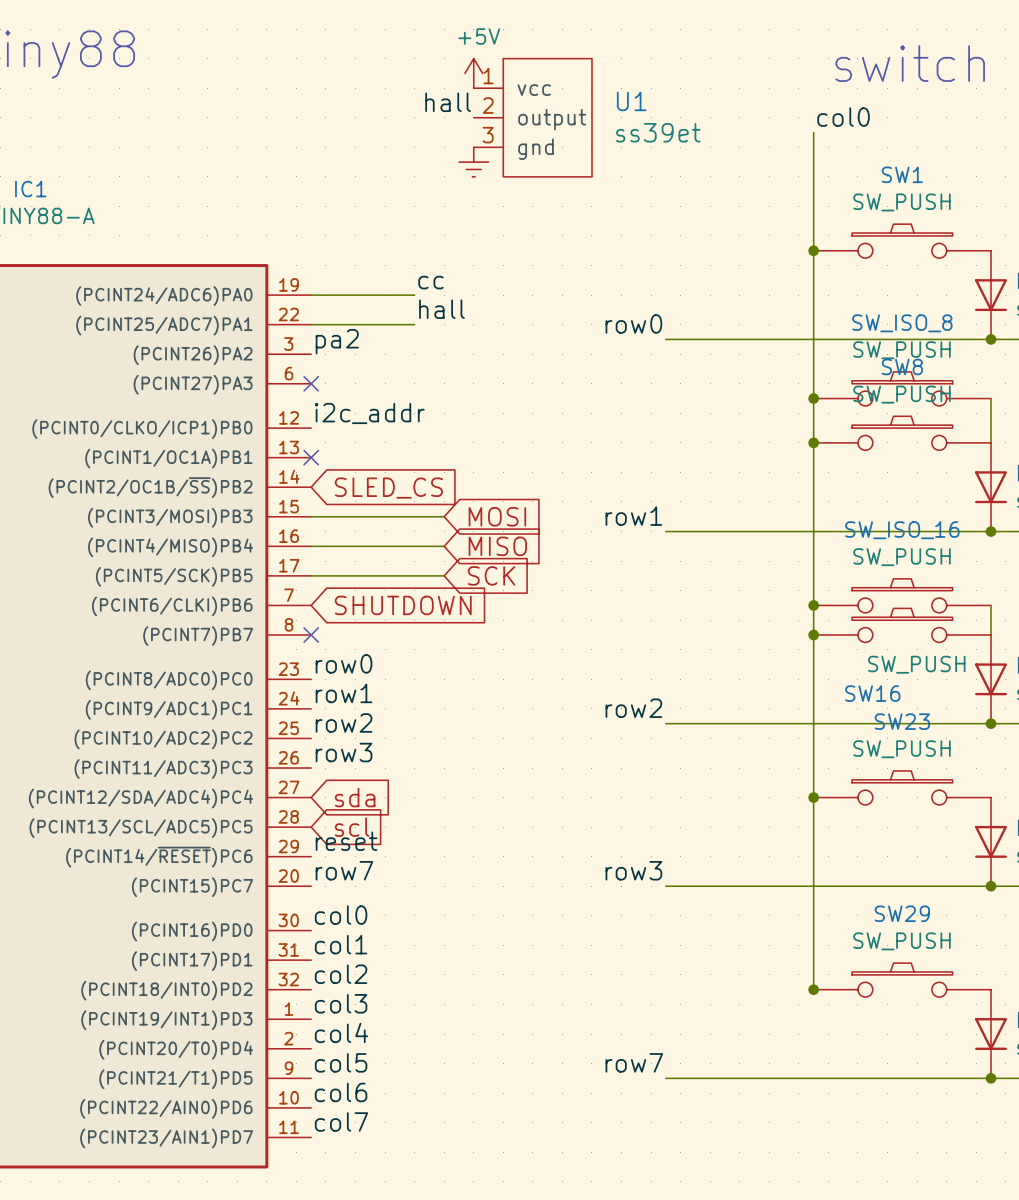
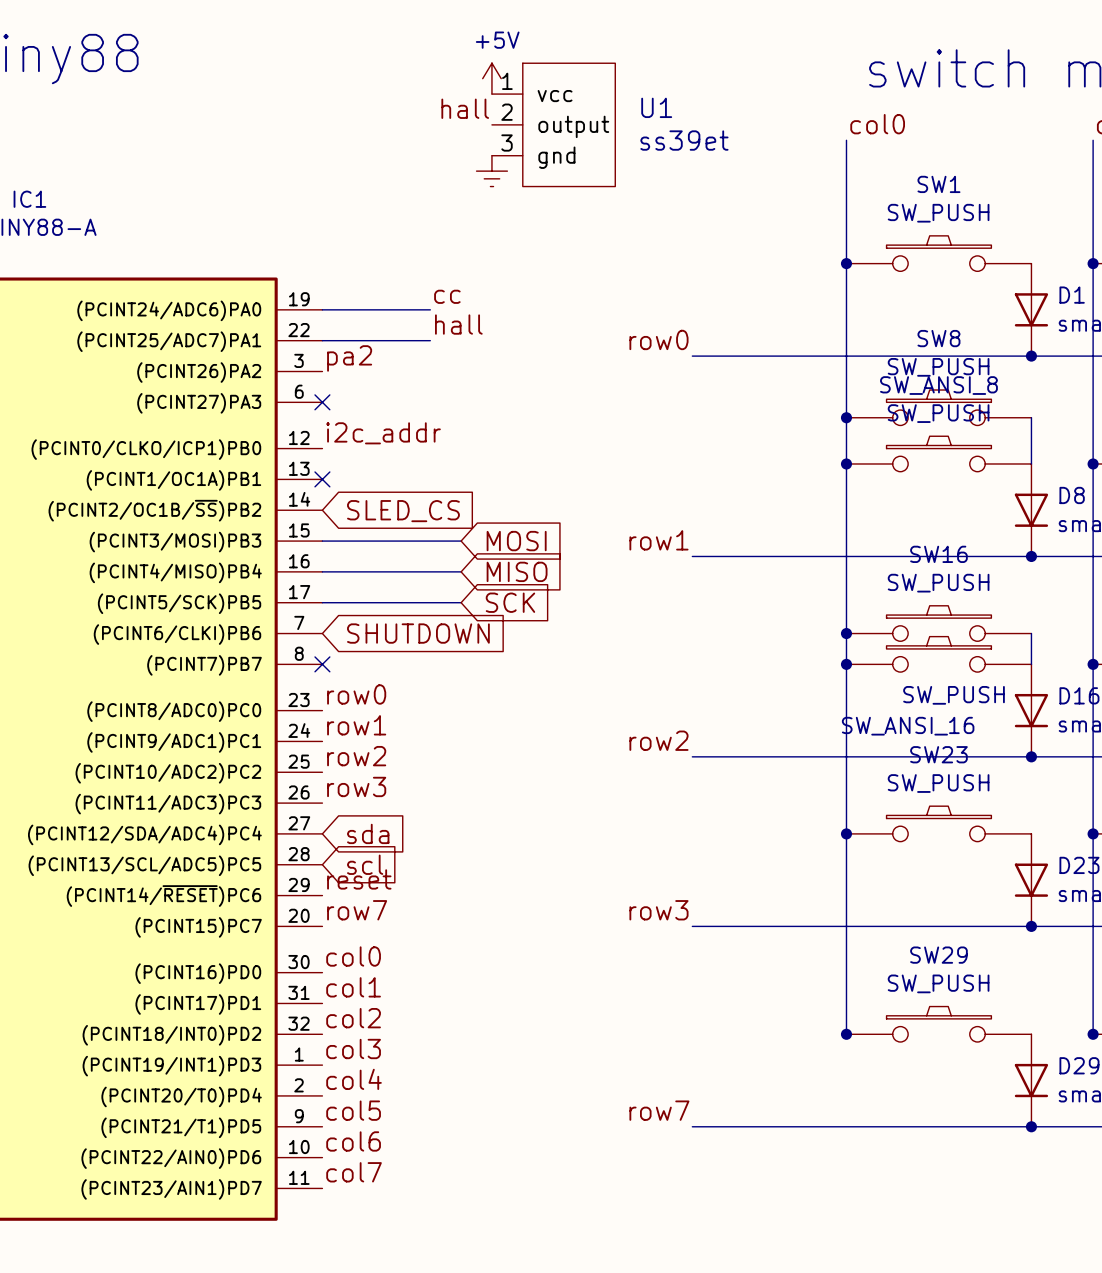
SW_ISO_8 name: SW_ISO_8 (902, 323) -> SW8 (938, 338)
SW8 name: SW8 (902, 366) -> SW_ANSI_8 (938, 385)
SW_ISO_16 name: SW_ISO_16 (902, 530) -> SW16 (938, 554)
SW16 name: SW16 (872, 693) -> SW_ANSI_16 (908, 726)

